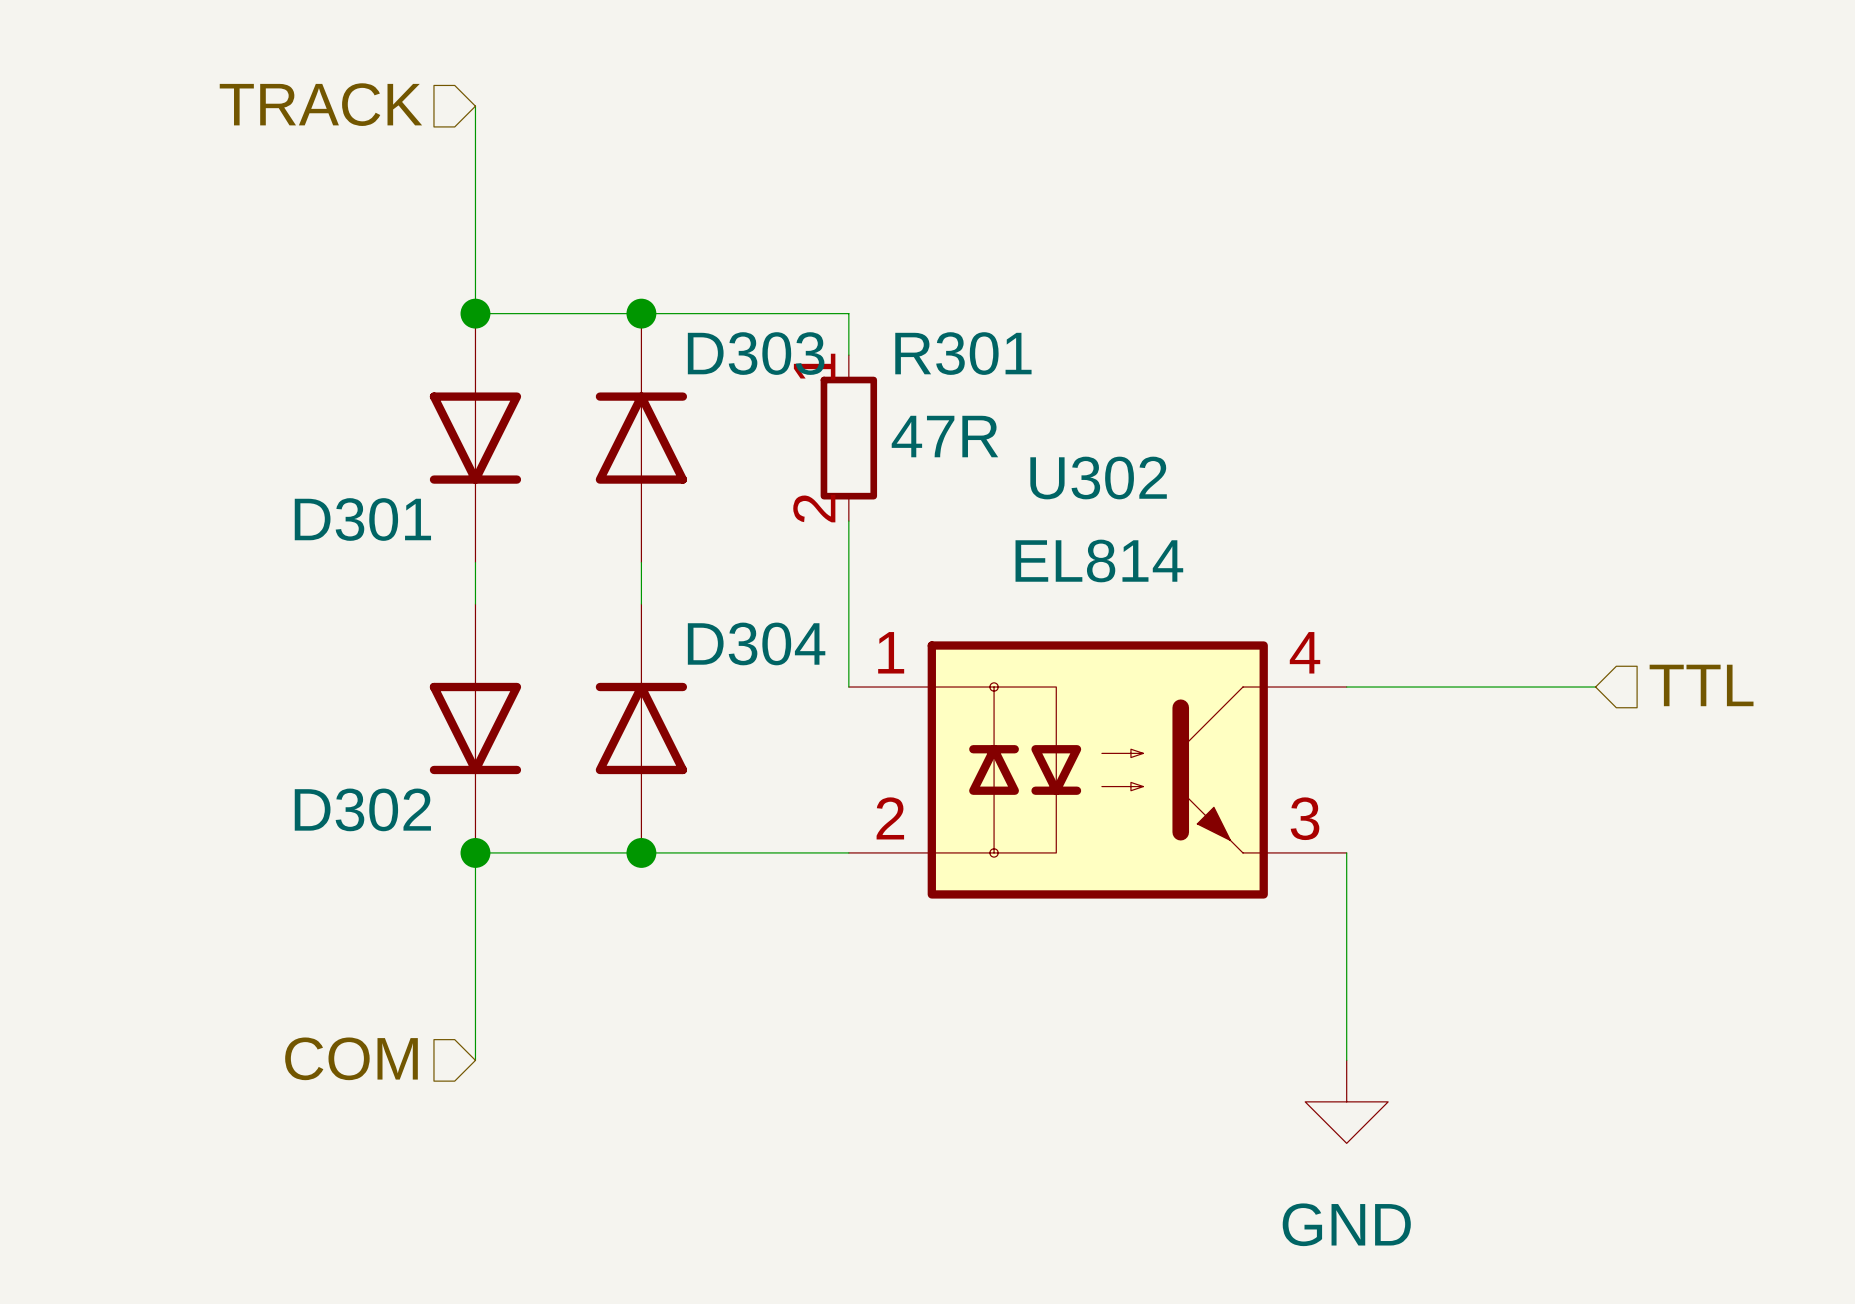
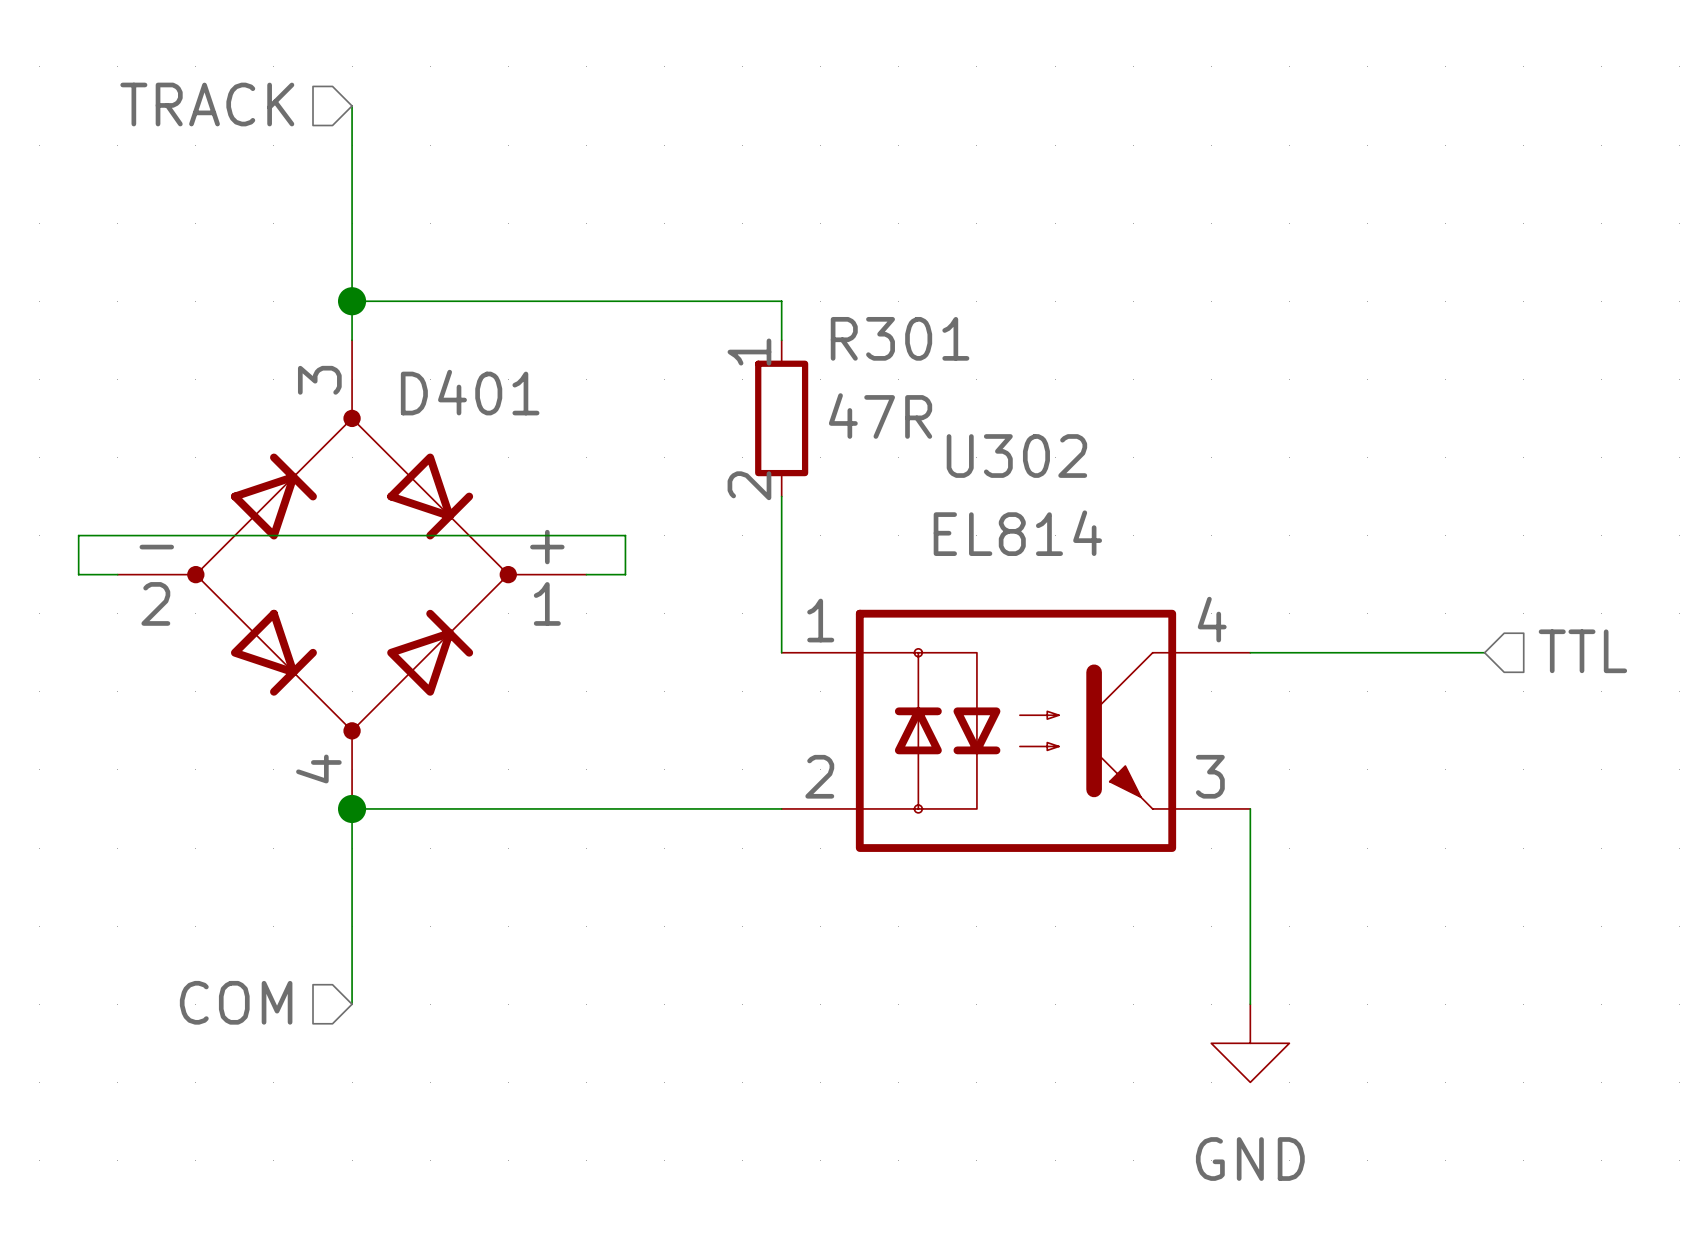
hierarchical label position: TRACK (320, 104) -> TRACK (207, 104)
wire: none -> (352, 105) (352, 340)
wire: (475, 106) (475, 313) -> (352, 301) (430, 301)
junction position: (475, 313) -> (352, 301)
junction: (641, 313) -> none
D301: (475, 438) -> none
D303: (641, 438) -> none
wire: (475, 562) (475, 604) -> none
wire: (641, 562) (641, 604) -> (117, 574) (78, 574) (78, 535) (625, 535) (625, 574) (586, 574)
D401: none -> (352, 574)
D302: (475, 728) -> none
D304: (641, 728) -> none
wire: (475, 852) (475, 1060) -> (430, 808) (352, 808) (352, 1004)
junction position: (475, 852) -> (352, 808)
junction: (641, 852) -> none
hierarchical label position: COM (351, 1058) -> COM (236, 1002)

